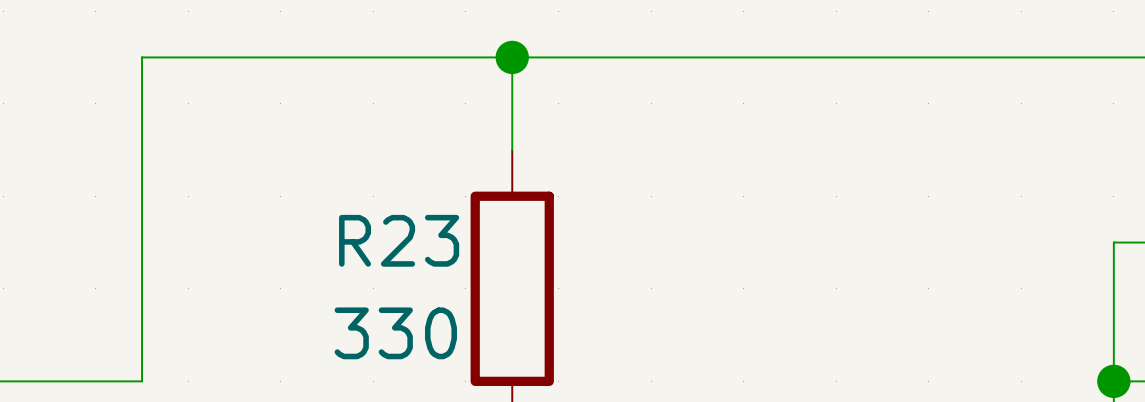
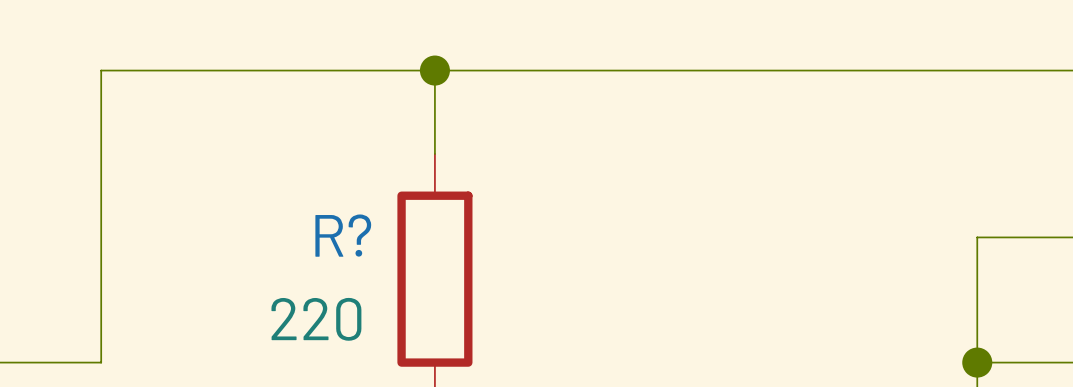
R23 name: R23 (399, 240) -> R? (343, 235)
R23 value: 330 (395, 333) -> 220 (316, 319)

